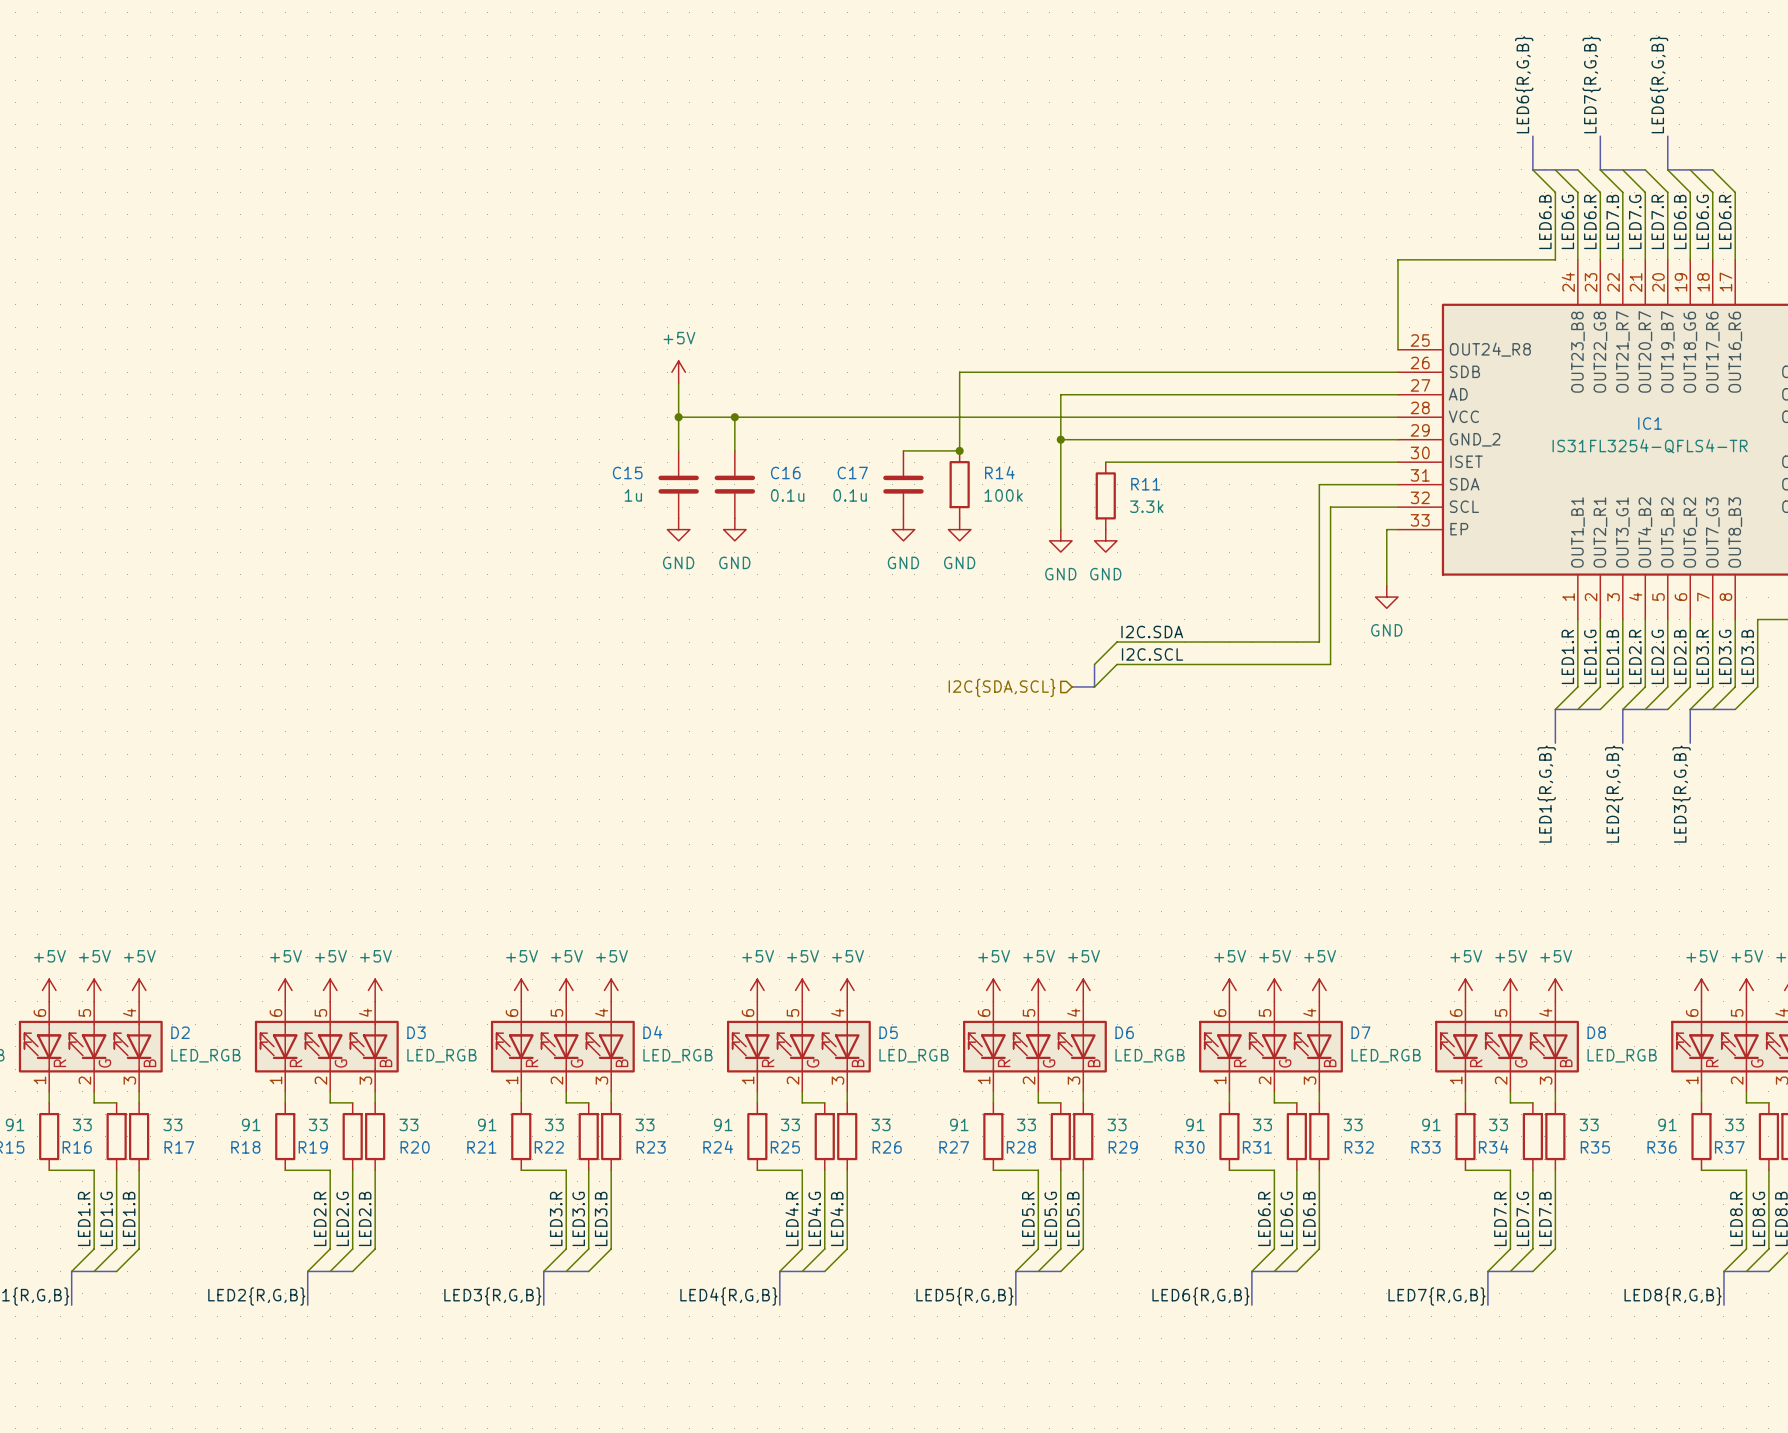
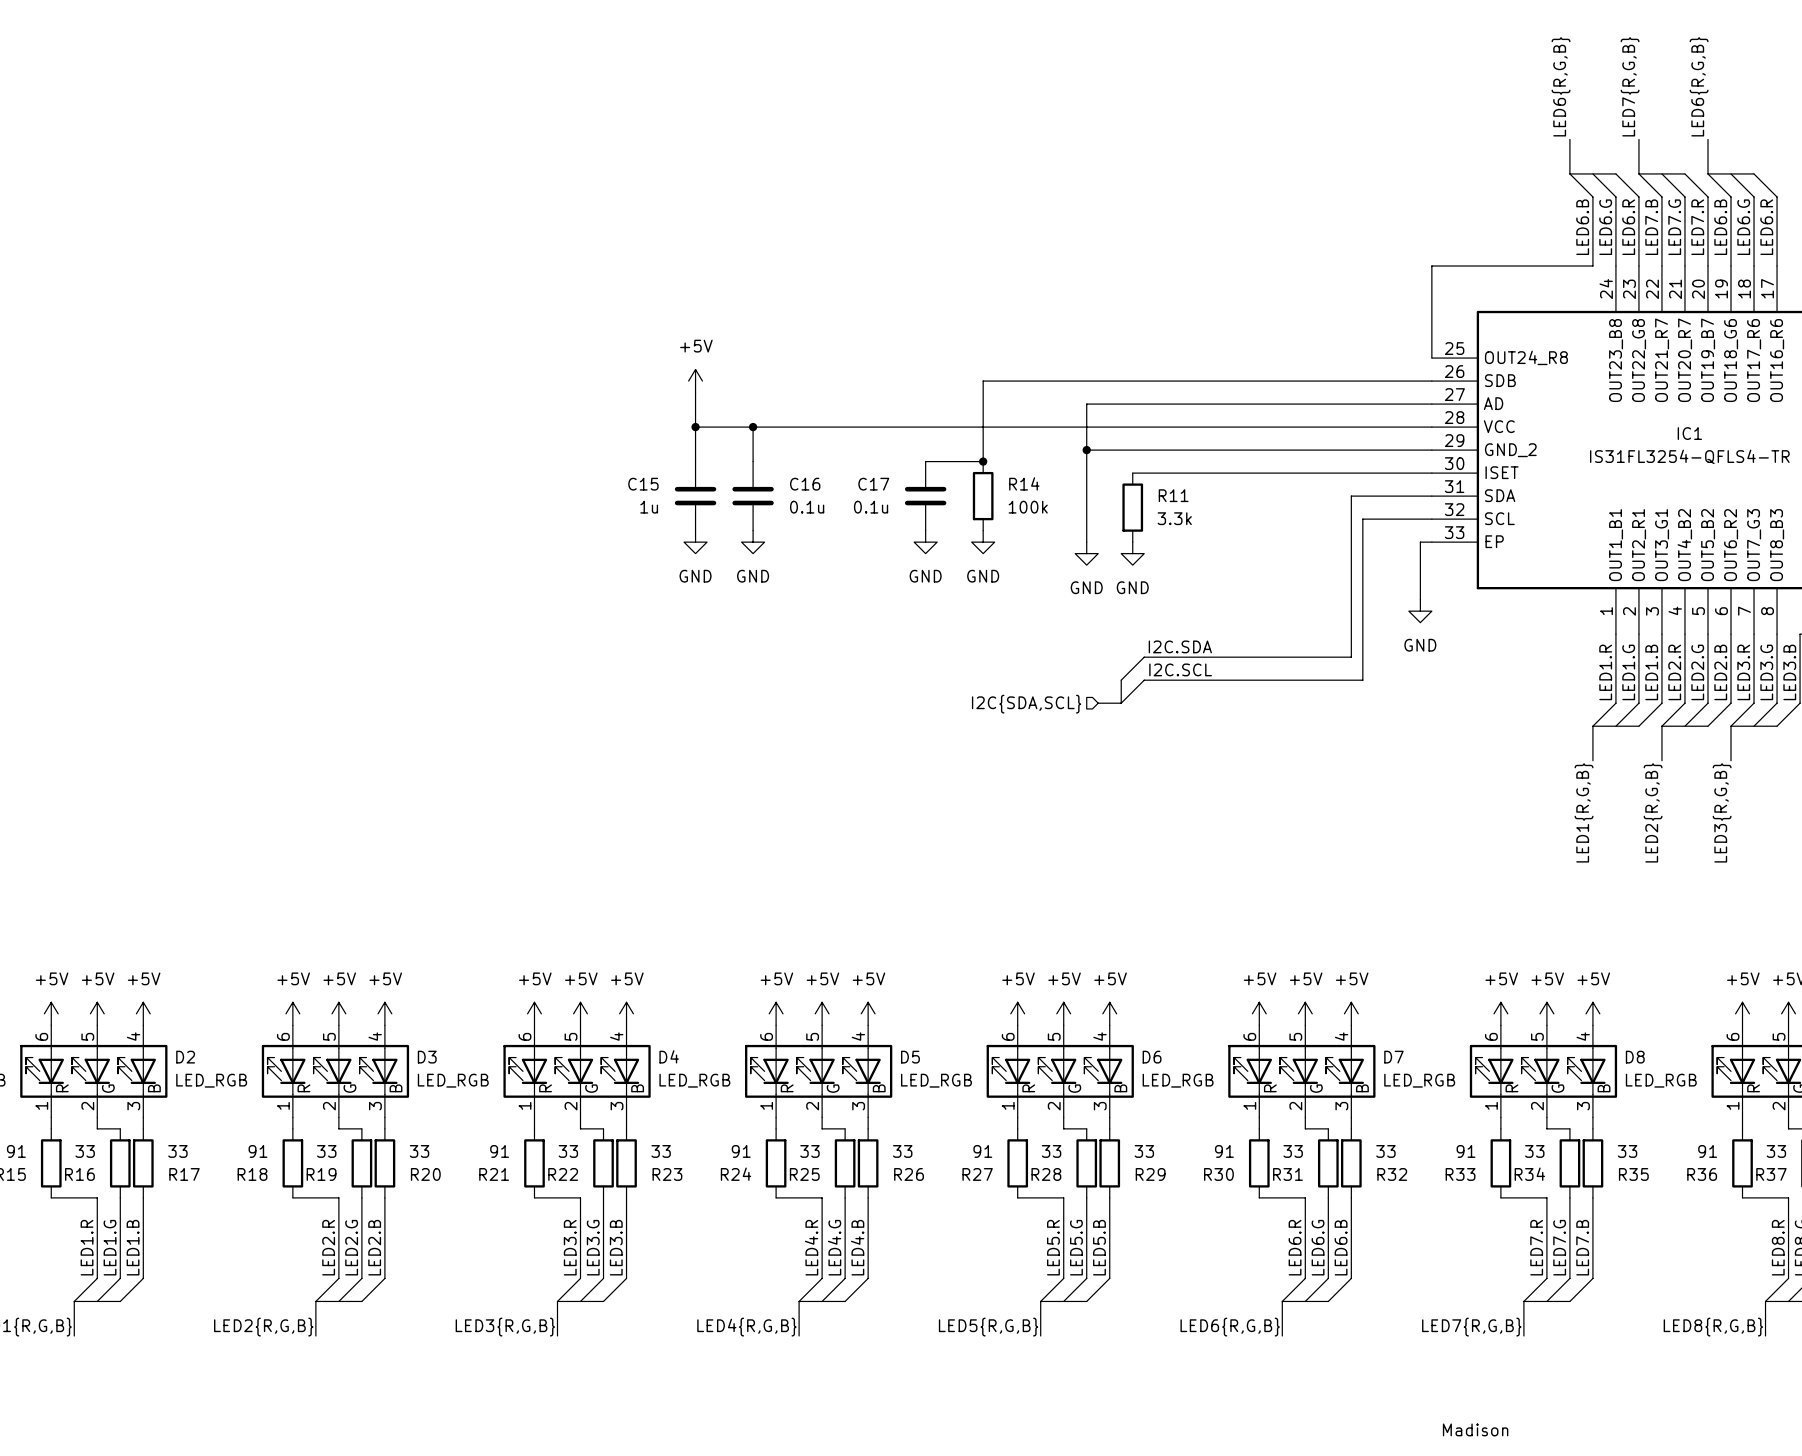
text: none -> Madison (1475, 1429)

